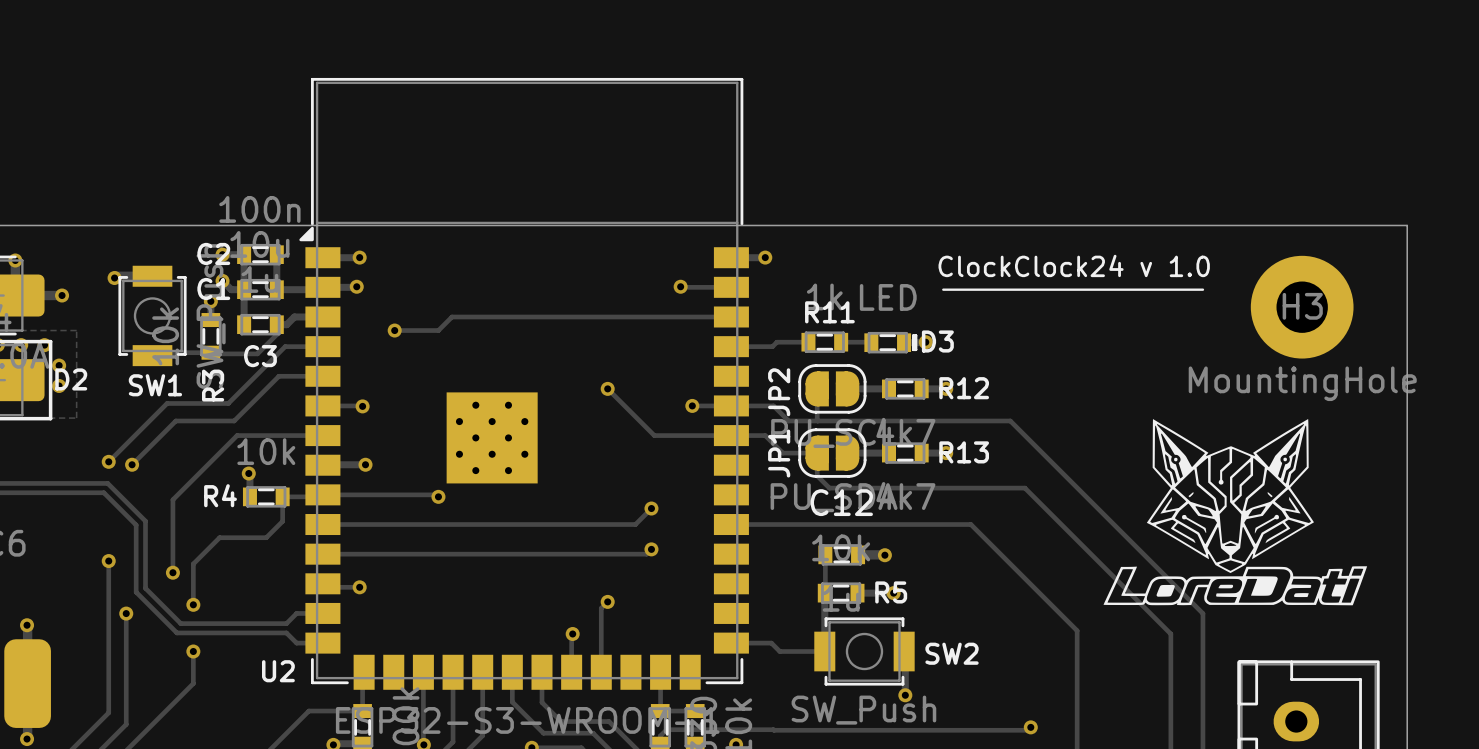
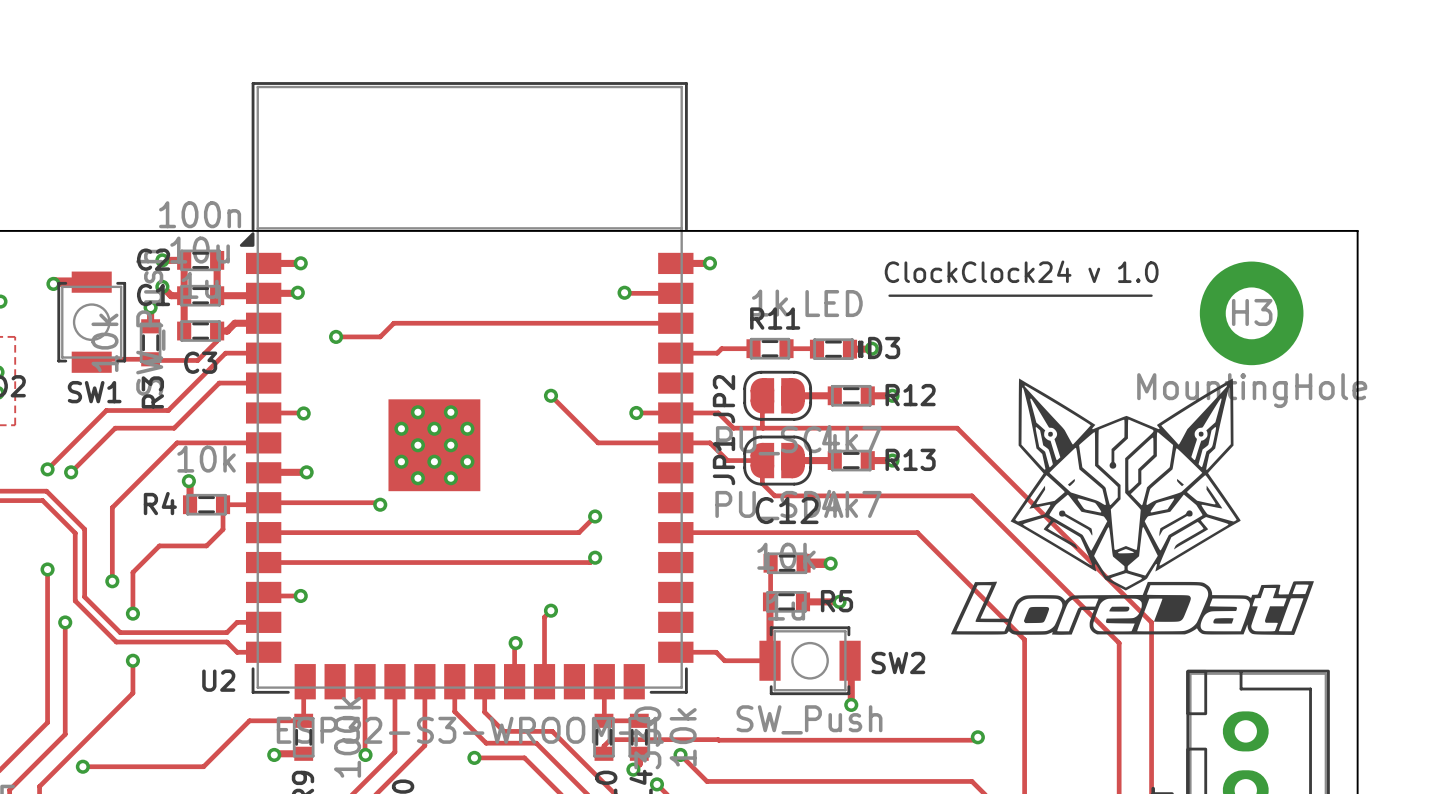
drawing: none -> [1010, 378, 1241, 624]
drawing: [1103, 419, 1368, 606] -> none
drawing shape: [1156, 584, 1175, 597] -> [951, 581, 1314, 635]

